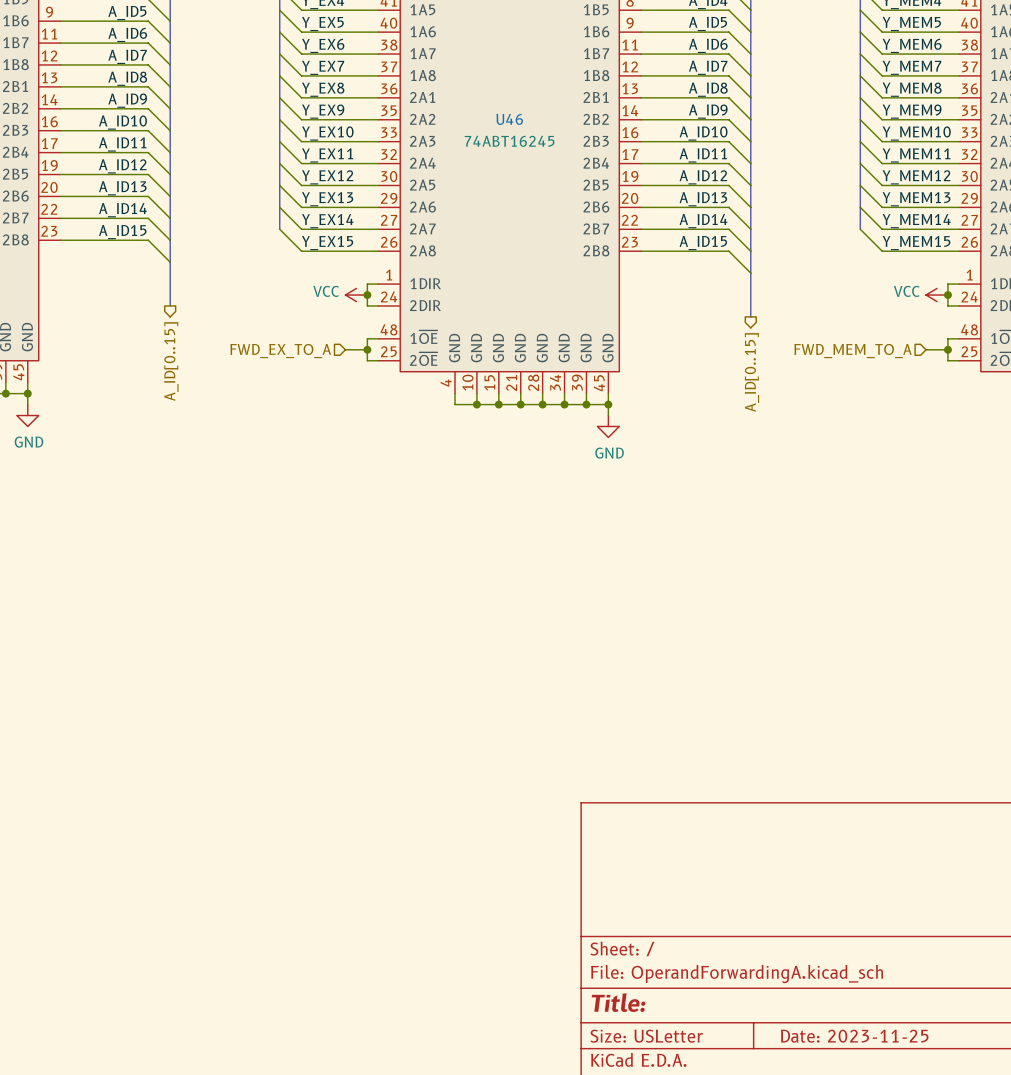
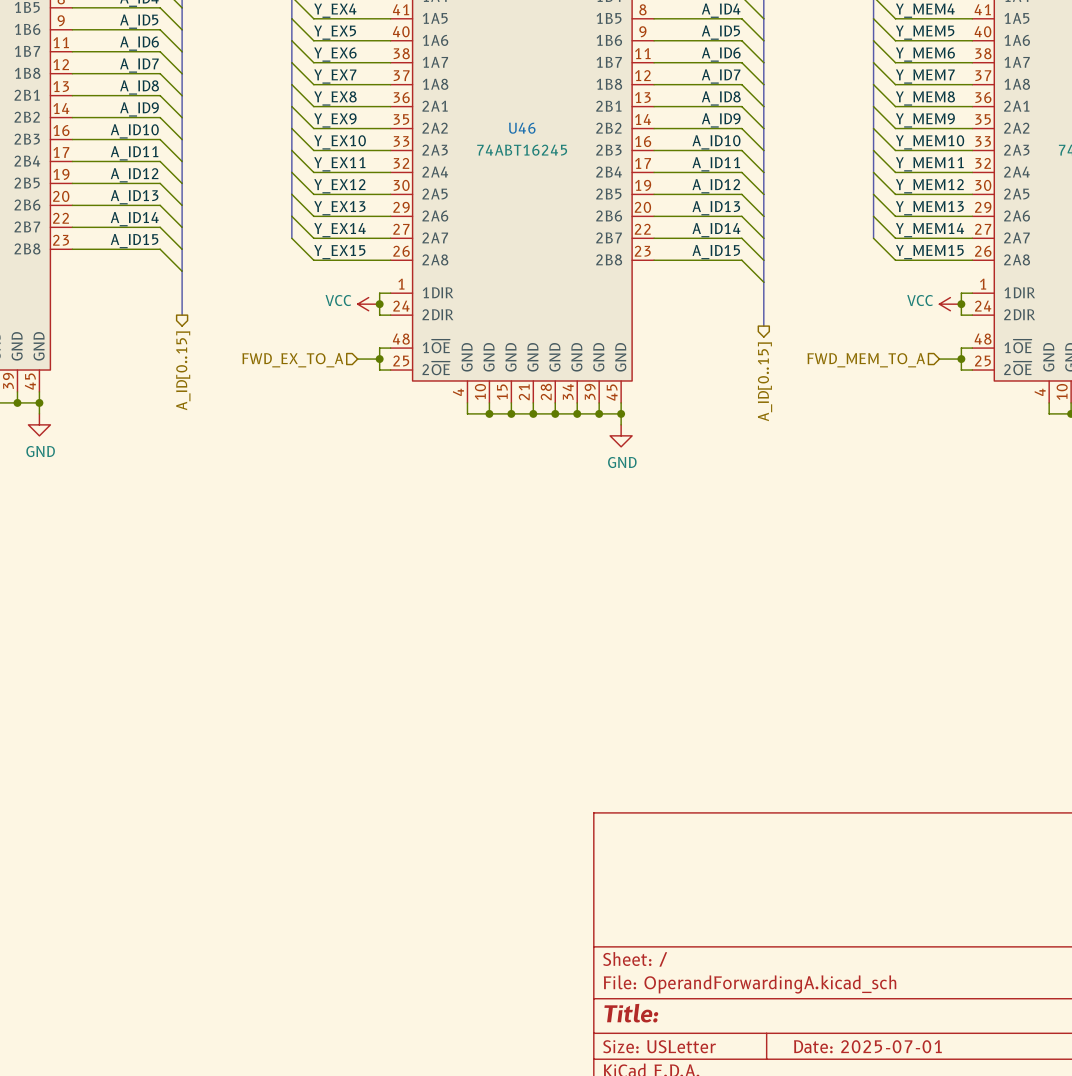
title block: Date: 2023-11-25 (854, 1036) -> Date: 2025-07-01 (867, 1046)

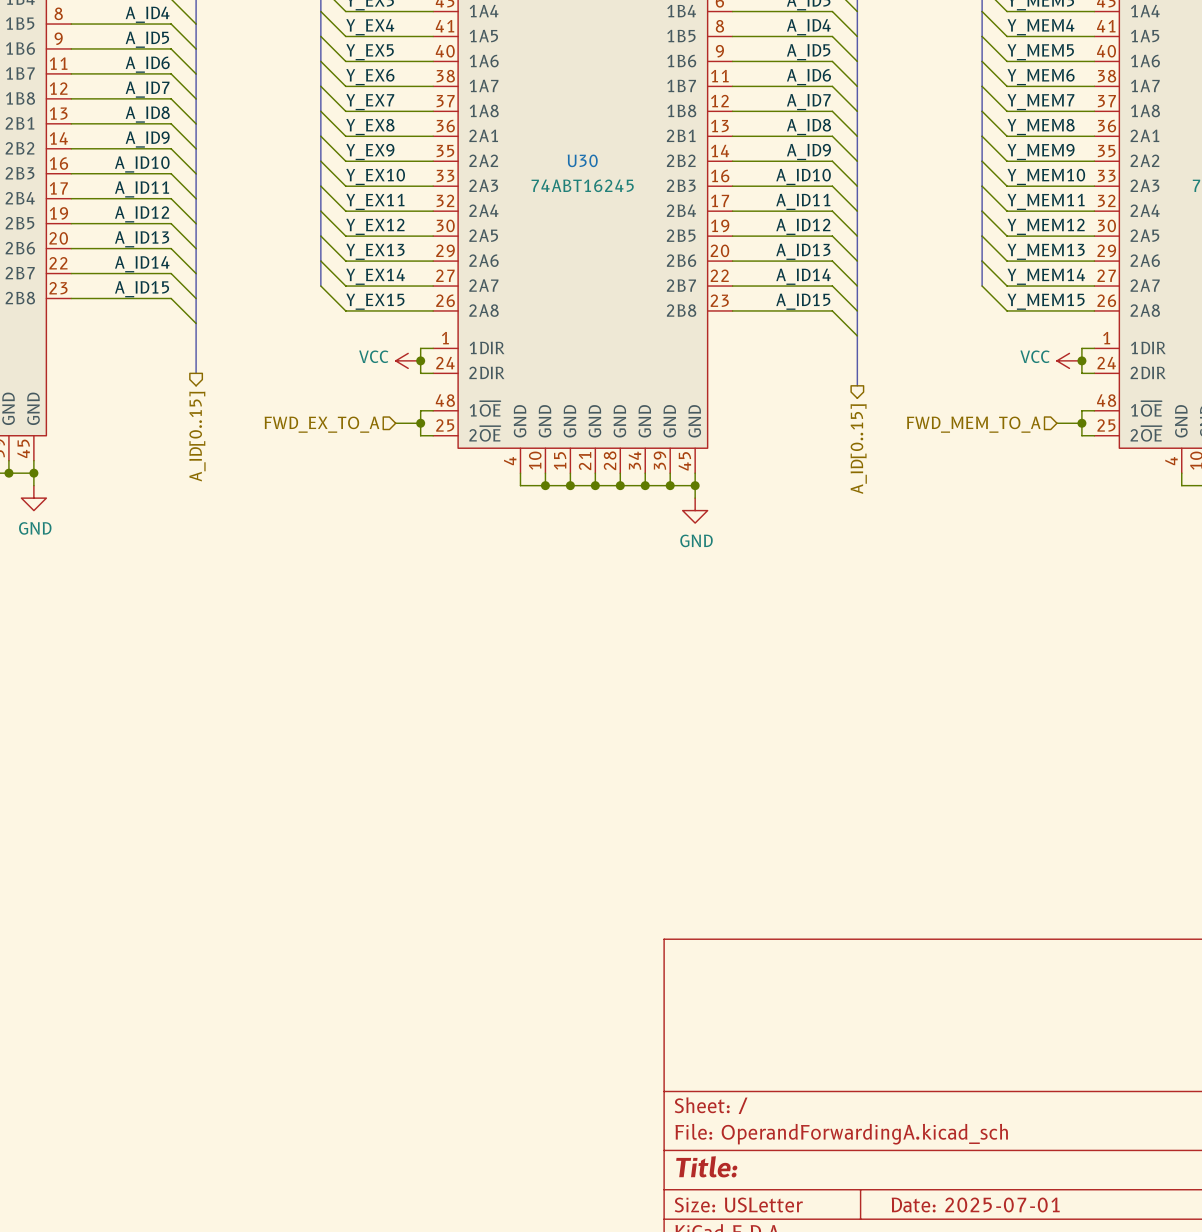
U46 name: U46 (522, 128) -> U30 (582, 160)

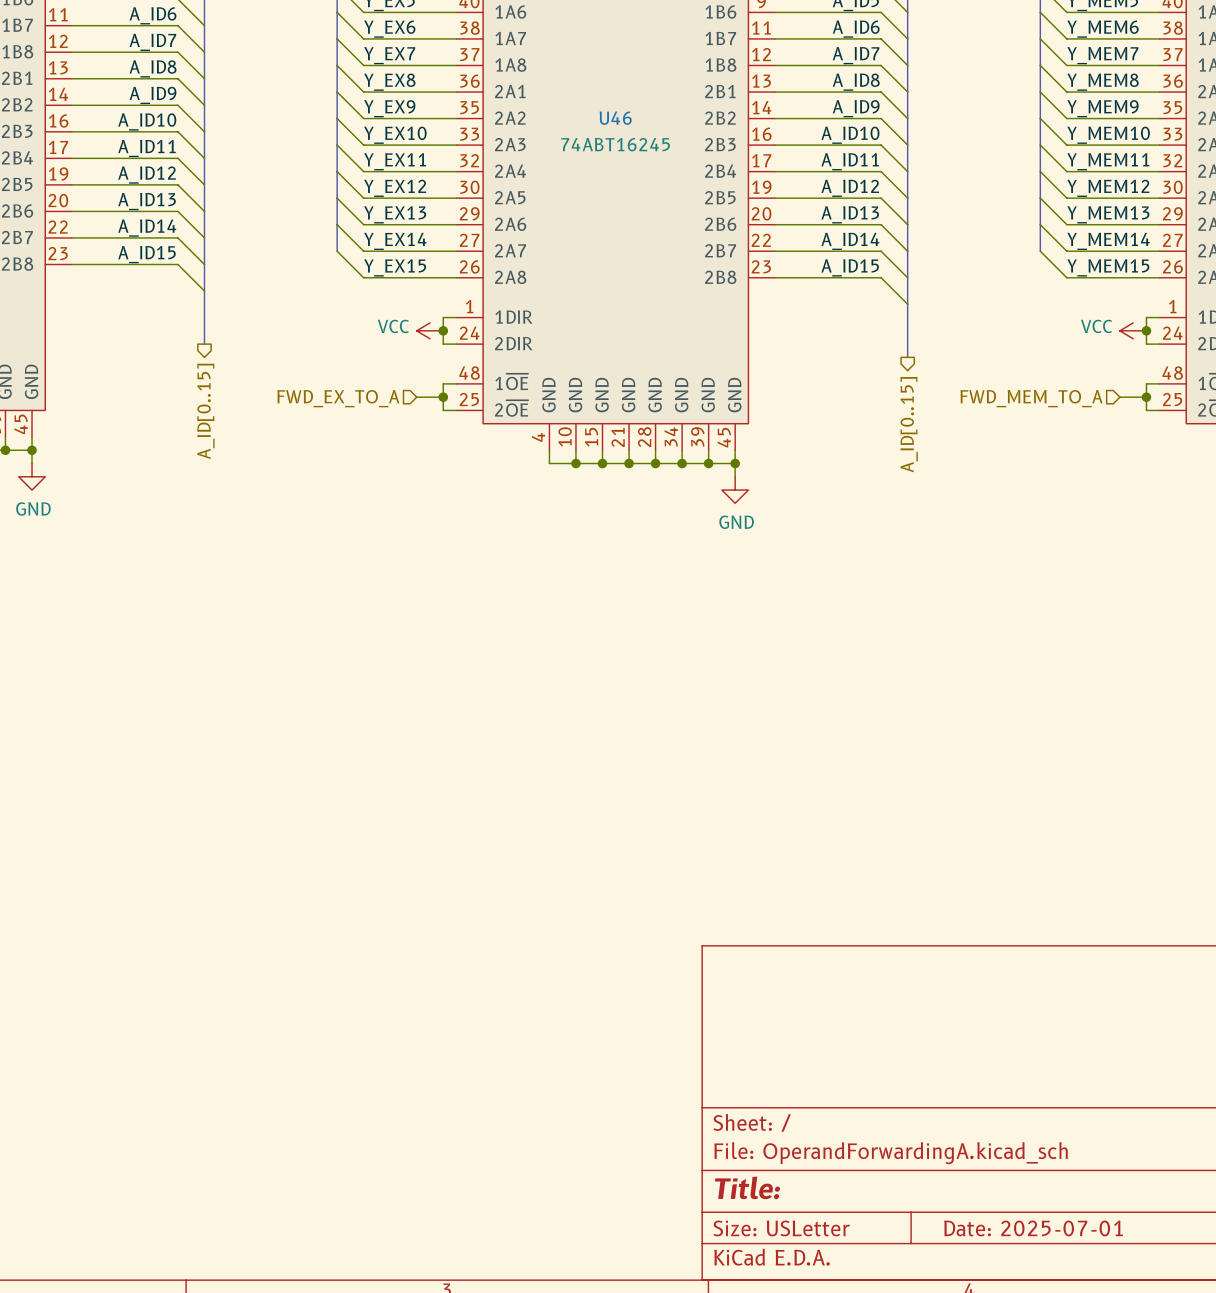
U30 name: U30 (582, 160) -> U46 (615, 118)

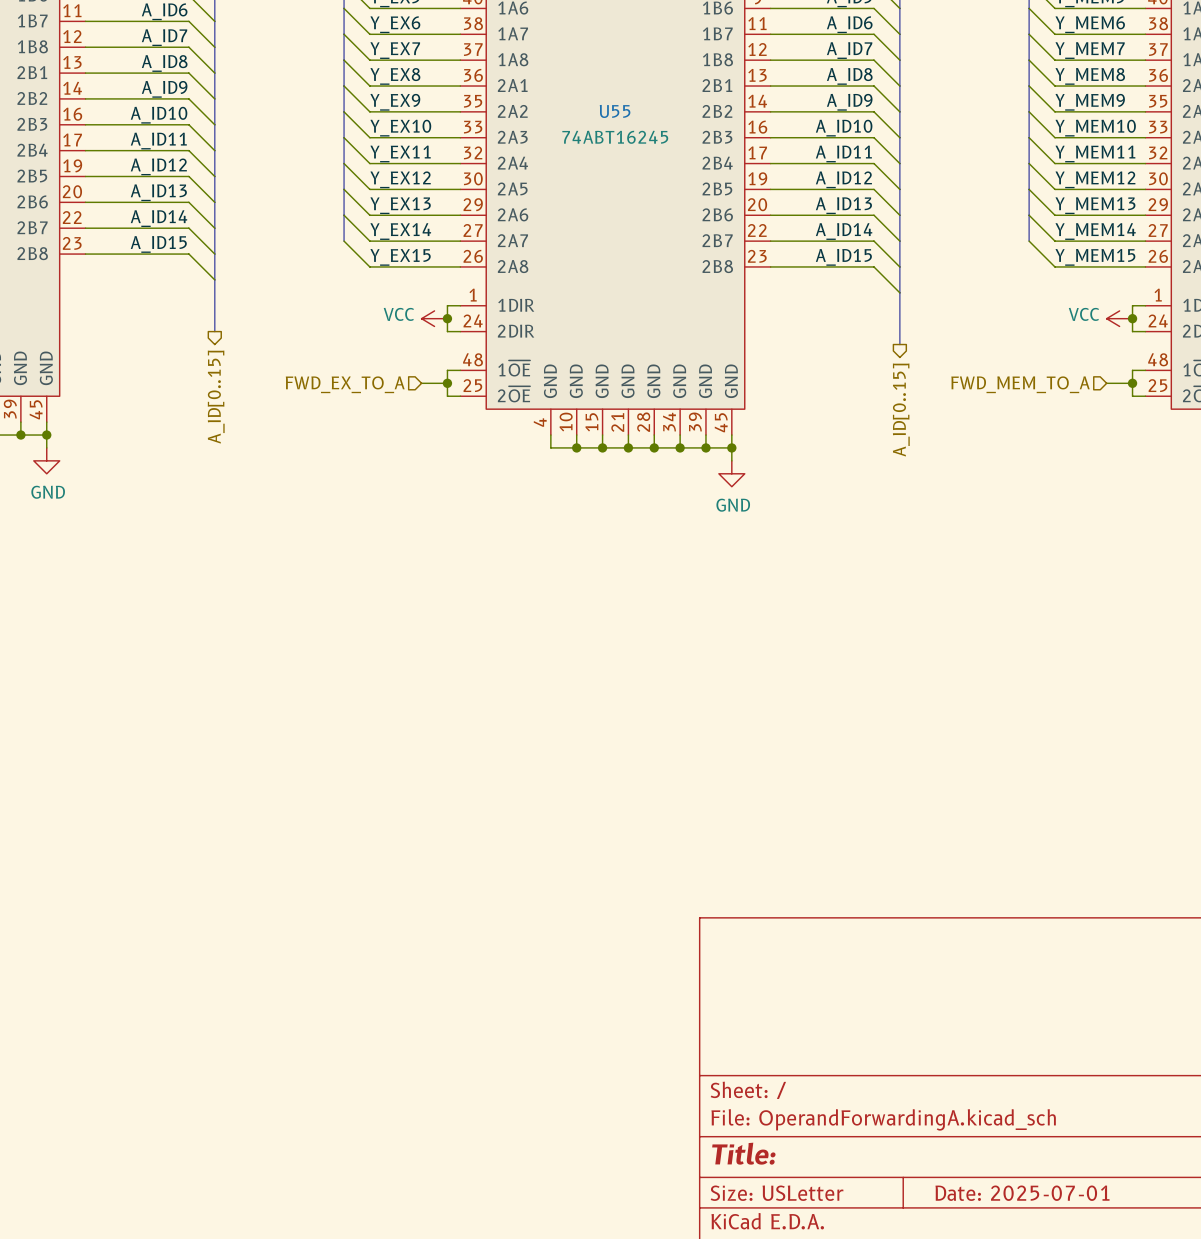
U46 name: U46 (615, 118) -> U55 (615, 111)

